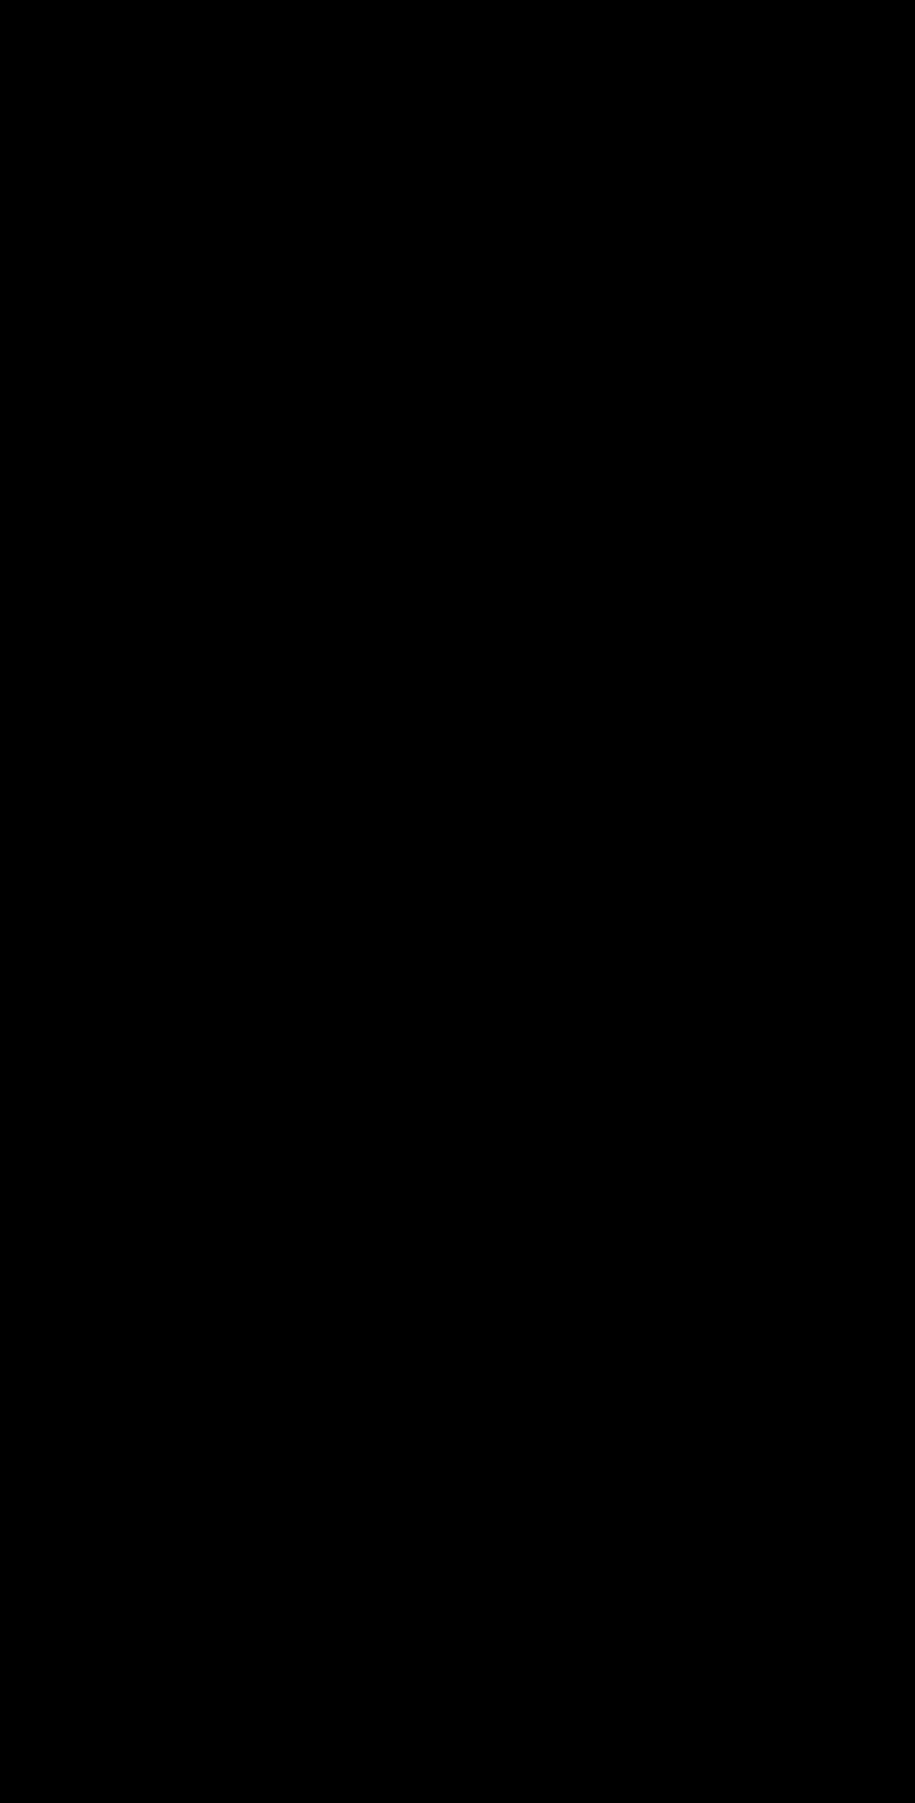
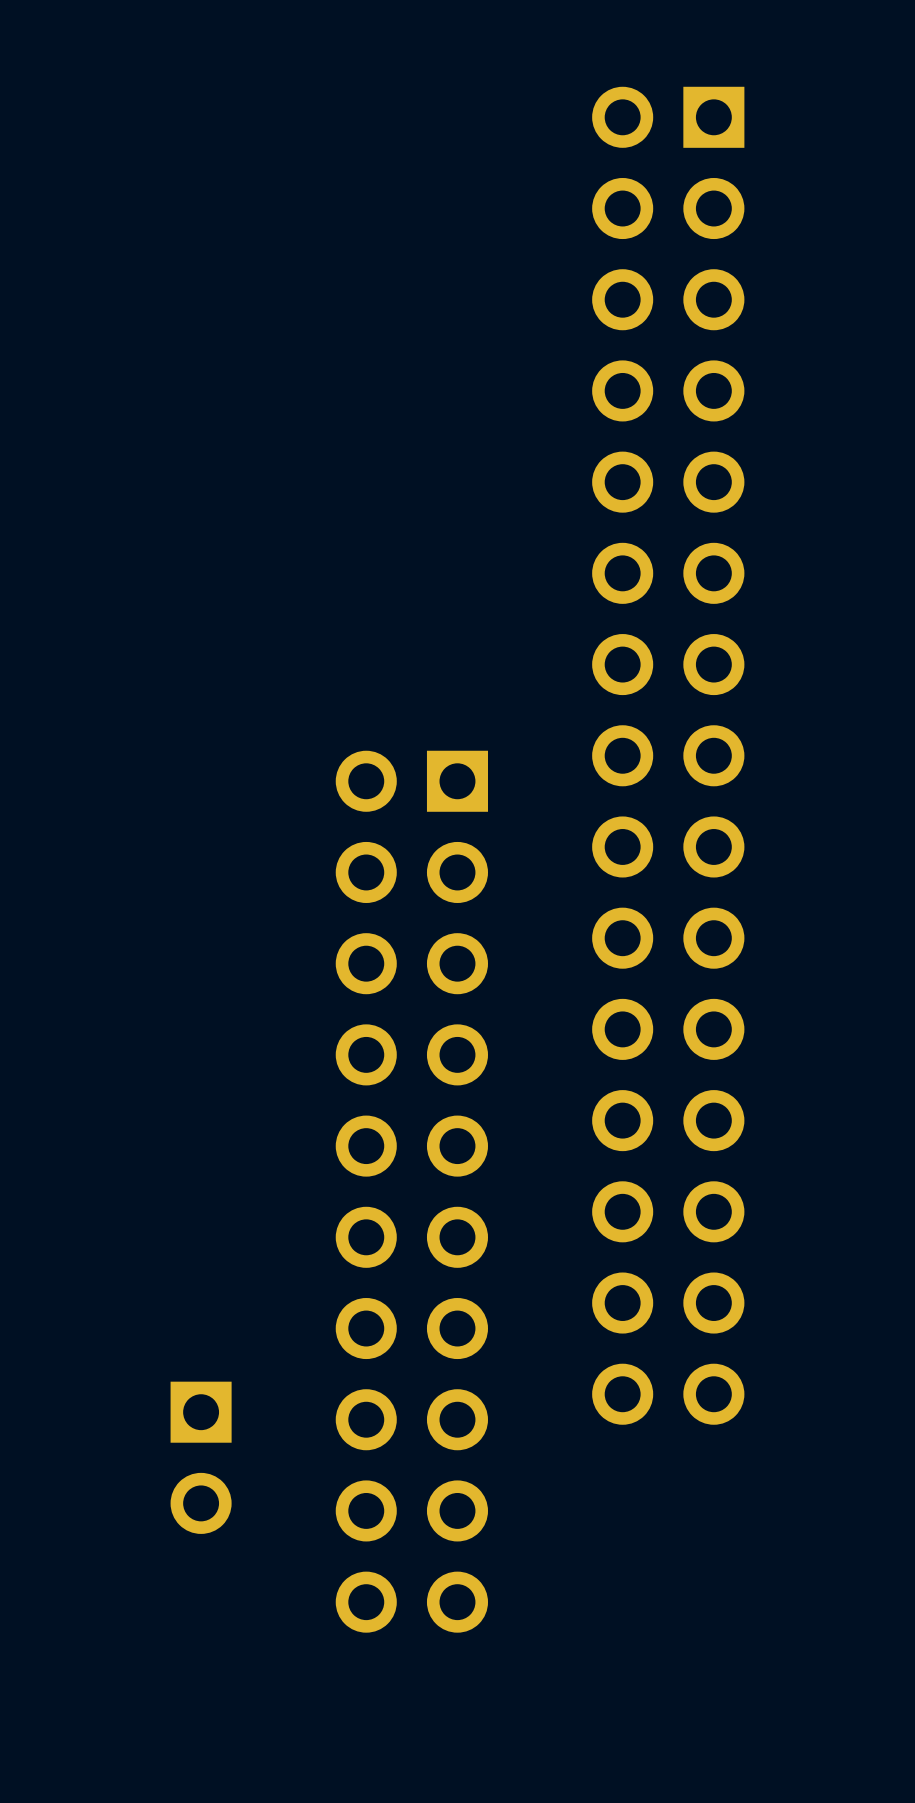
part: none -> (668, 755)
part: none -> (411, 1191)
part: none -> (201, 1457)

